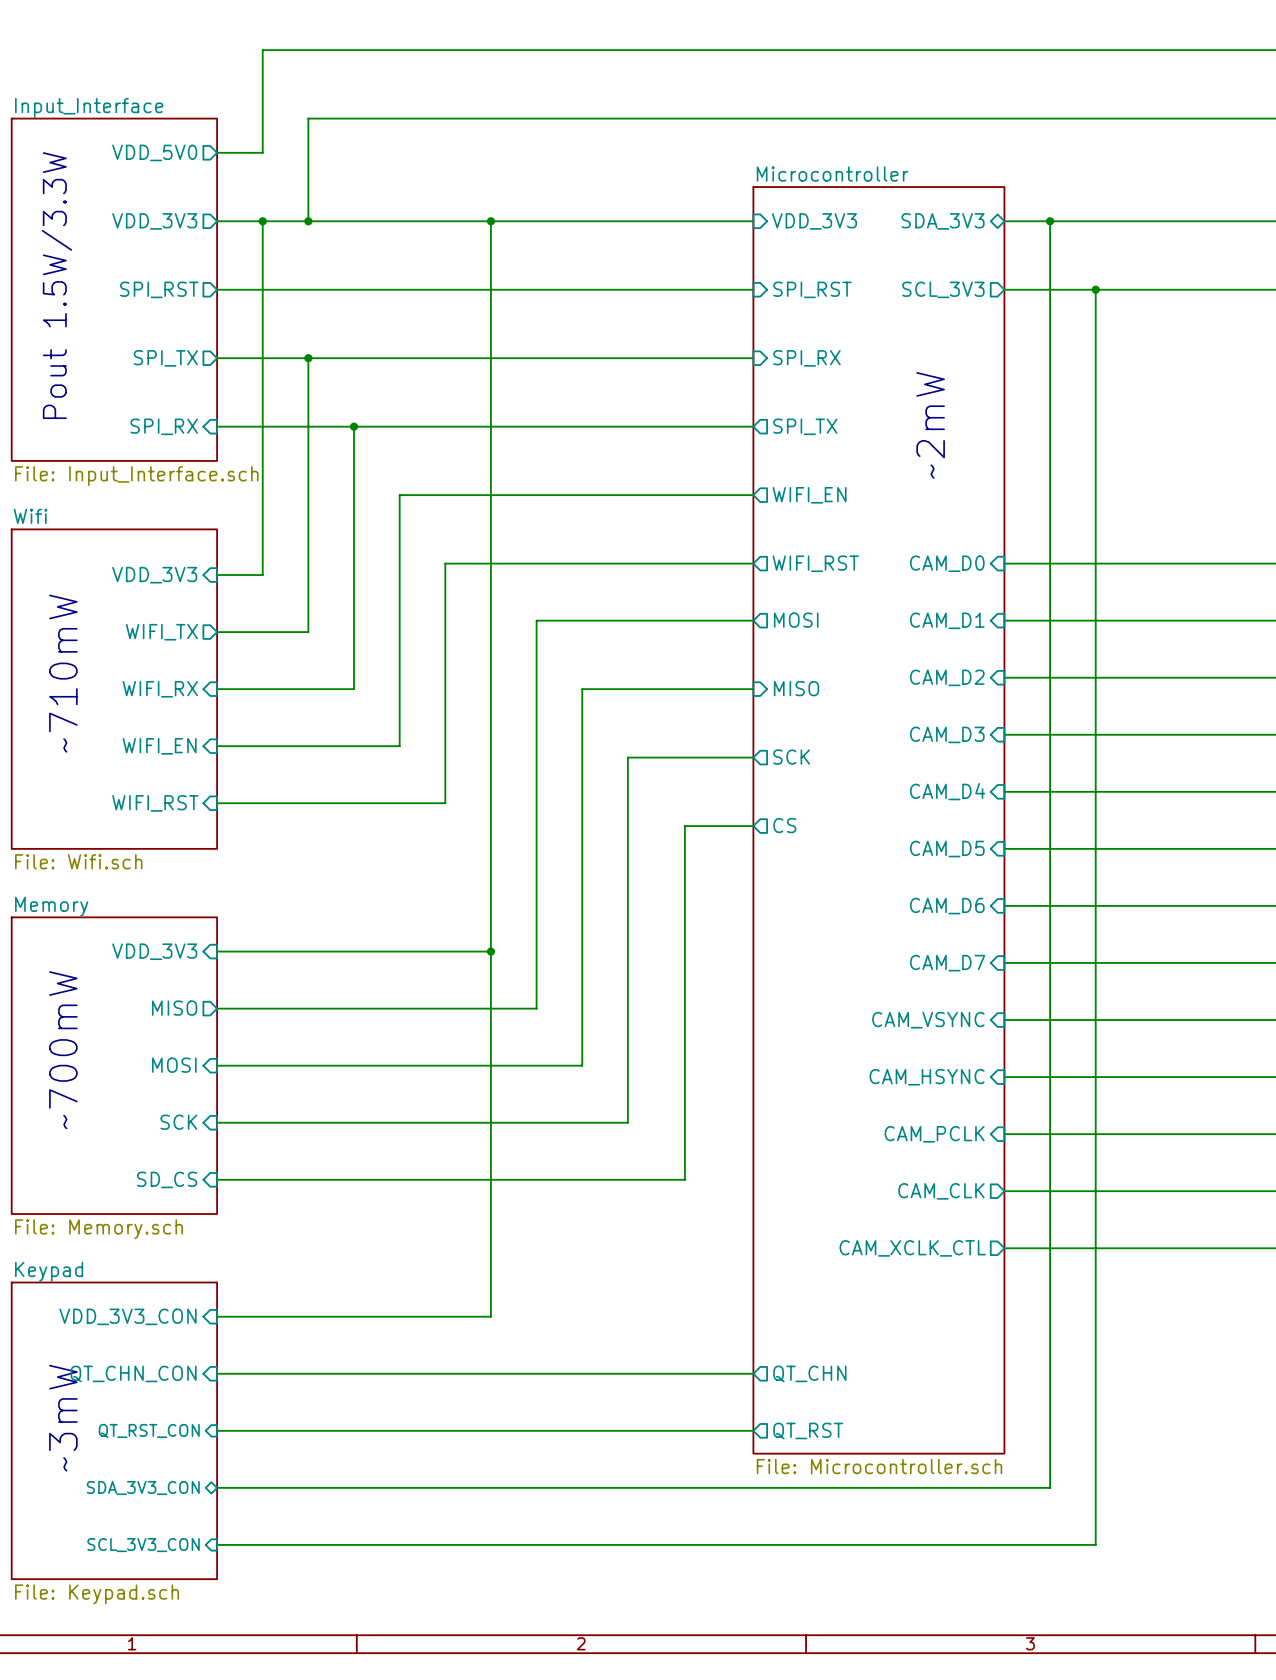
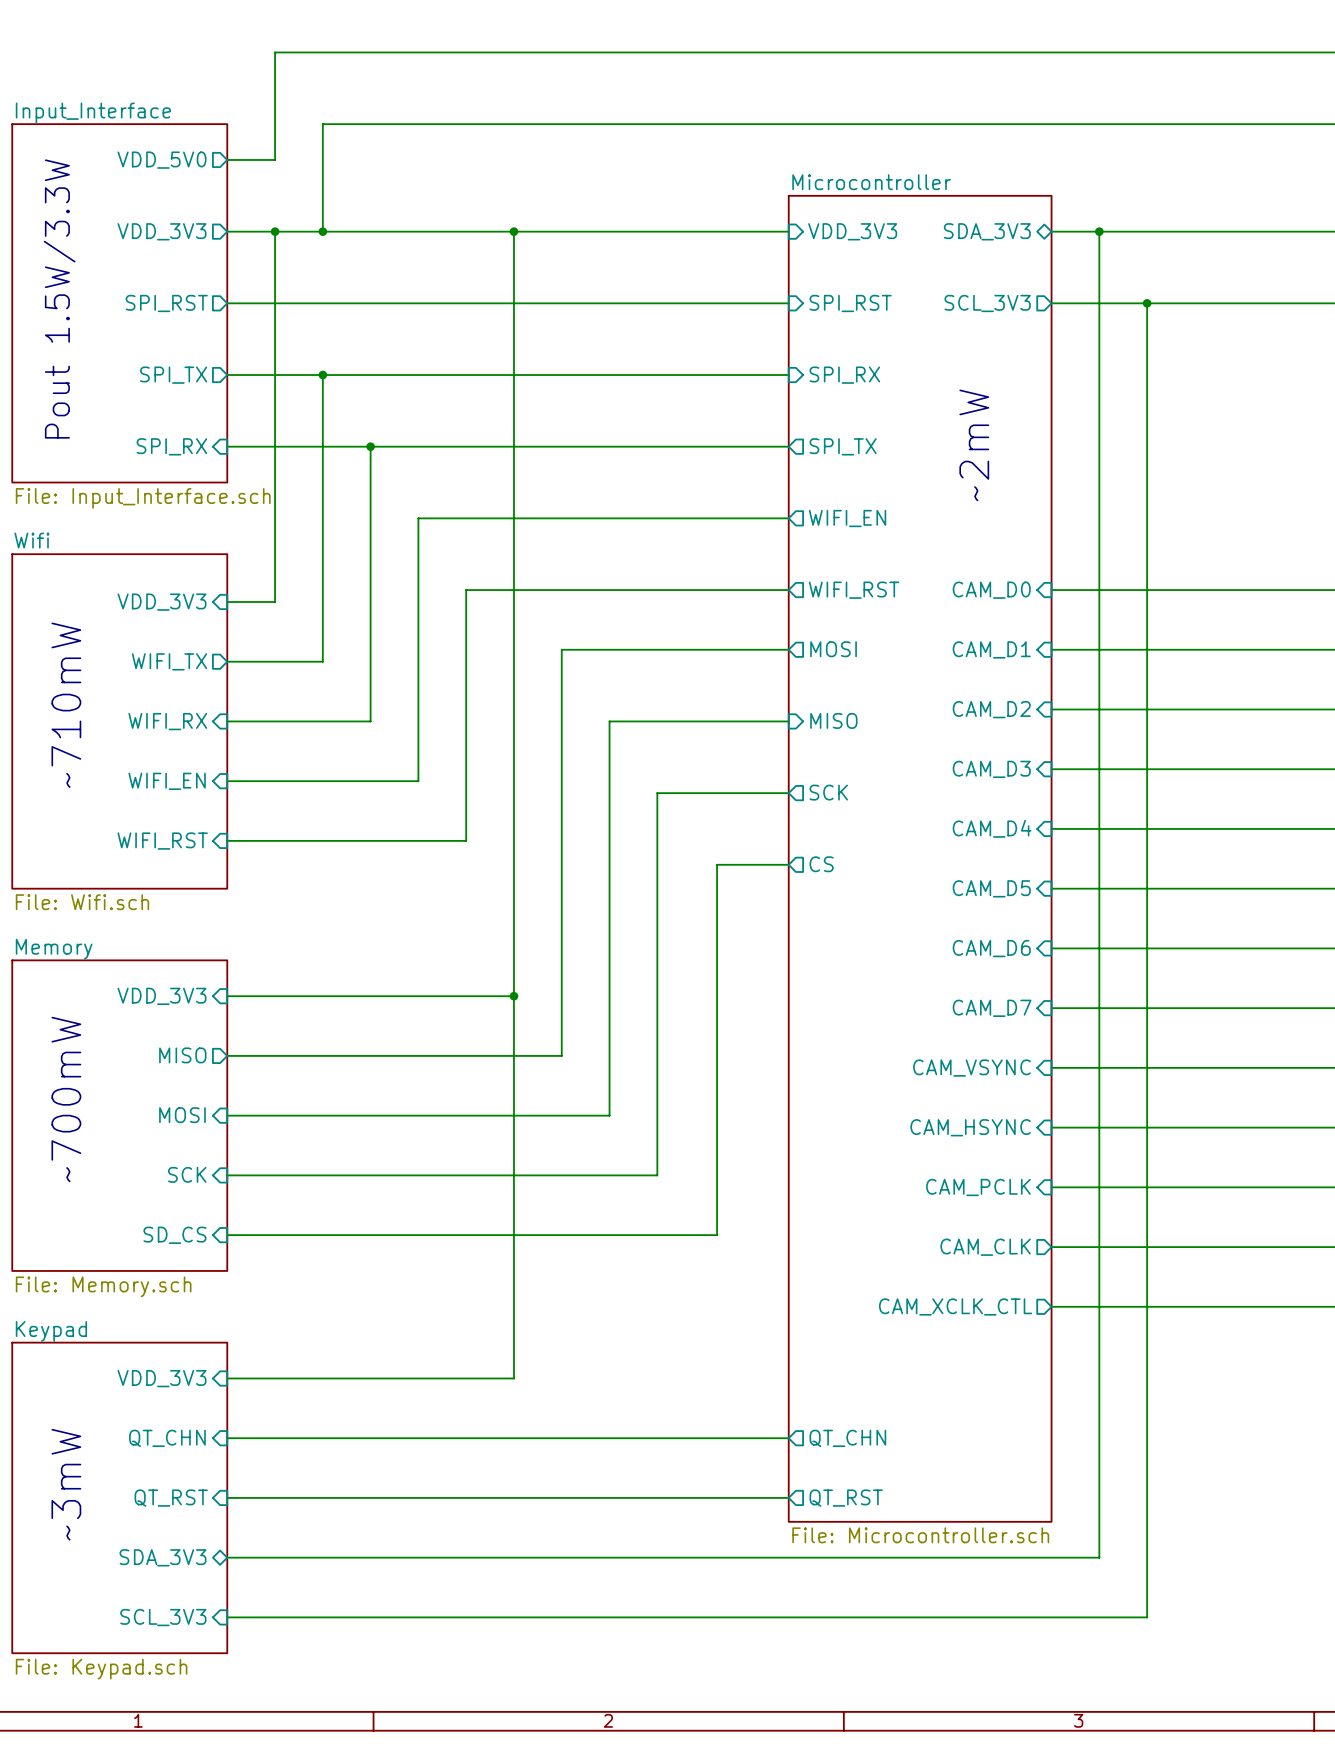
sheet pin: VDD_3V3_CON (128, 1316) -> VDD_3V3 (161, 1378)
sheet pin: QT_CHN_CON (133, 1373) -> QT_CHN (167, 1438)
sheet pin: QT_RST_CON (149, 1430) -> QT_RST (171, 1498)
sheet pin: SDA_3V3_CON (143, 1488) -> SDA_3V3 (163, 1557)
sheet pin: SCL_3V3_CON (143, 1545) -> SCL_3V3 (163, 1617)

